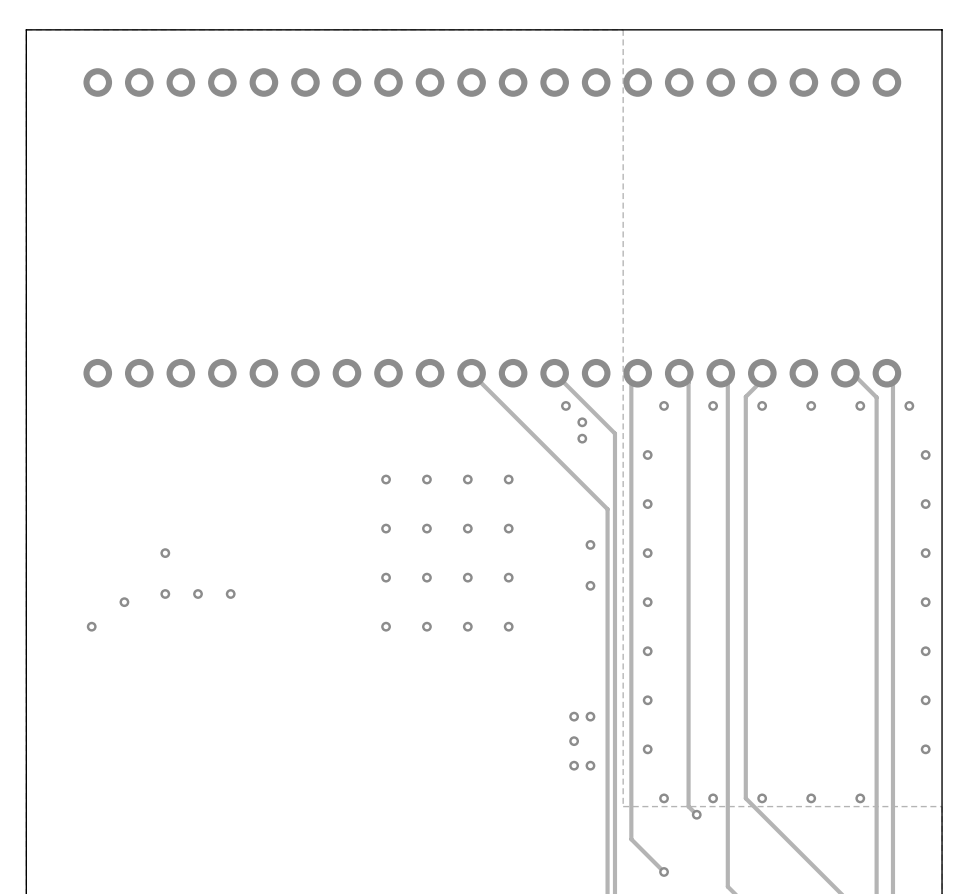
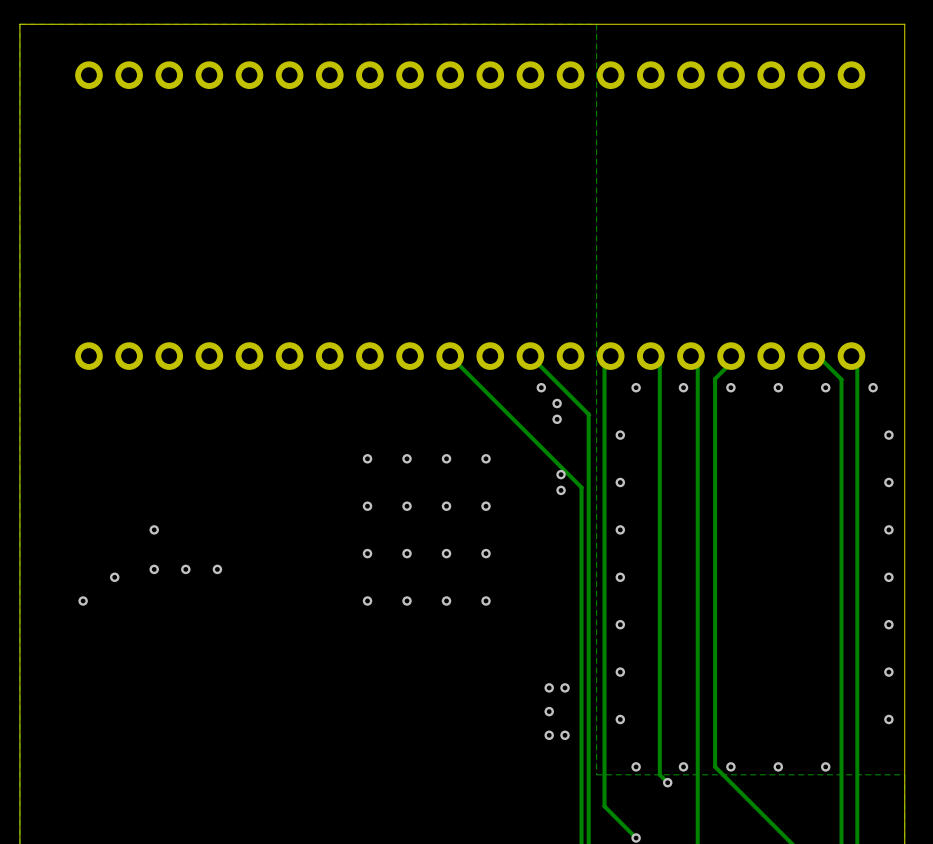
via: none -> (561, 474)
via: none -> (561, 490)
via: (590, 544) -> none
via: (590, 585) -> none

